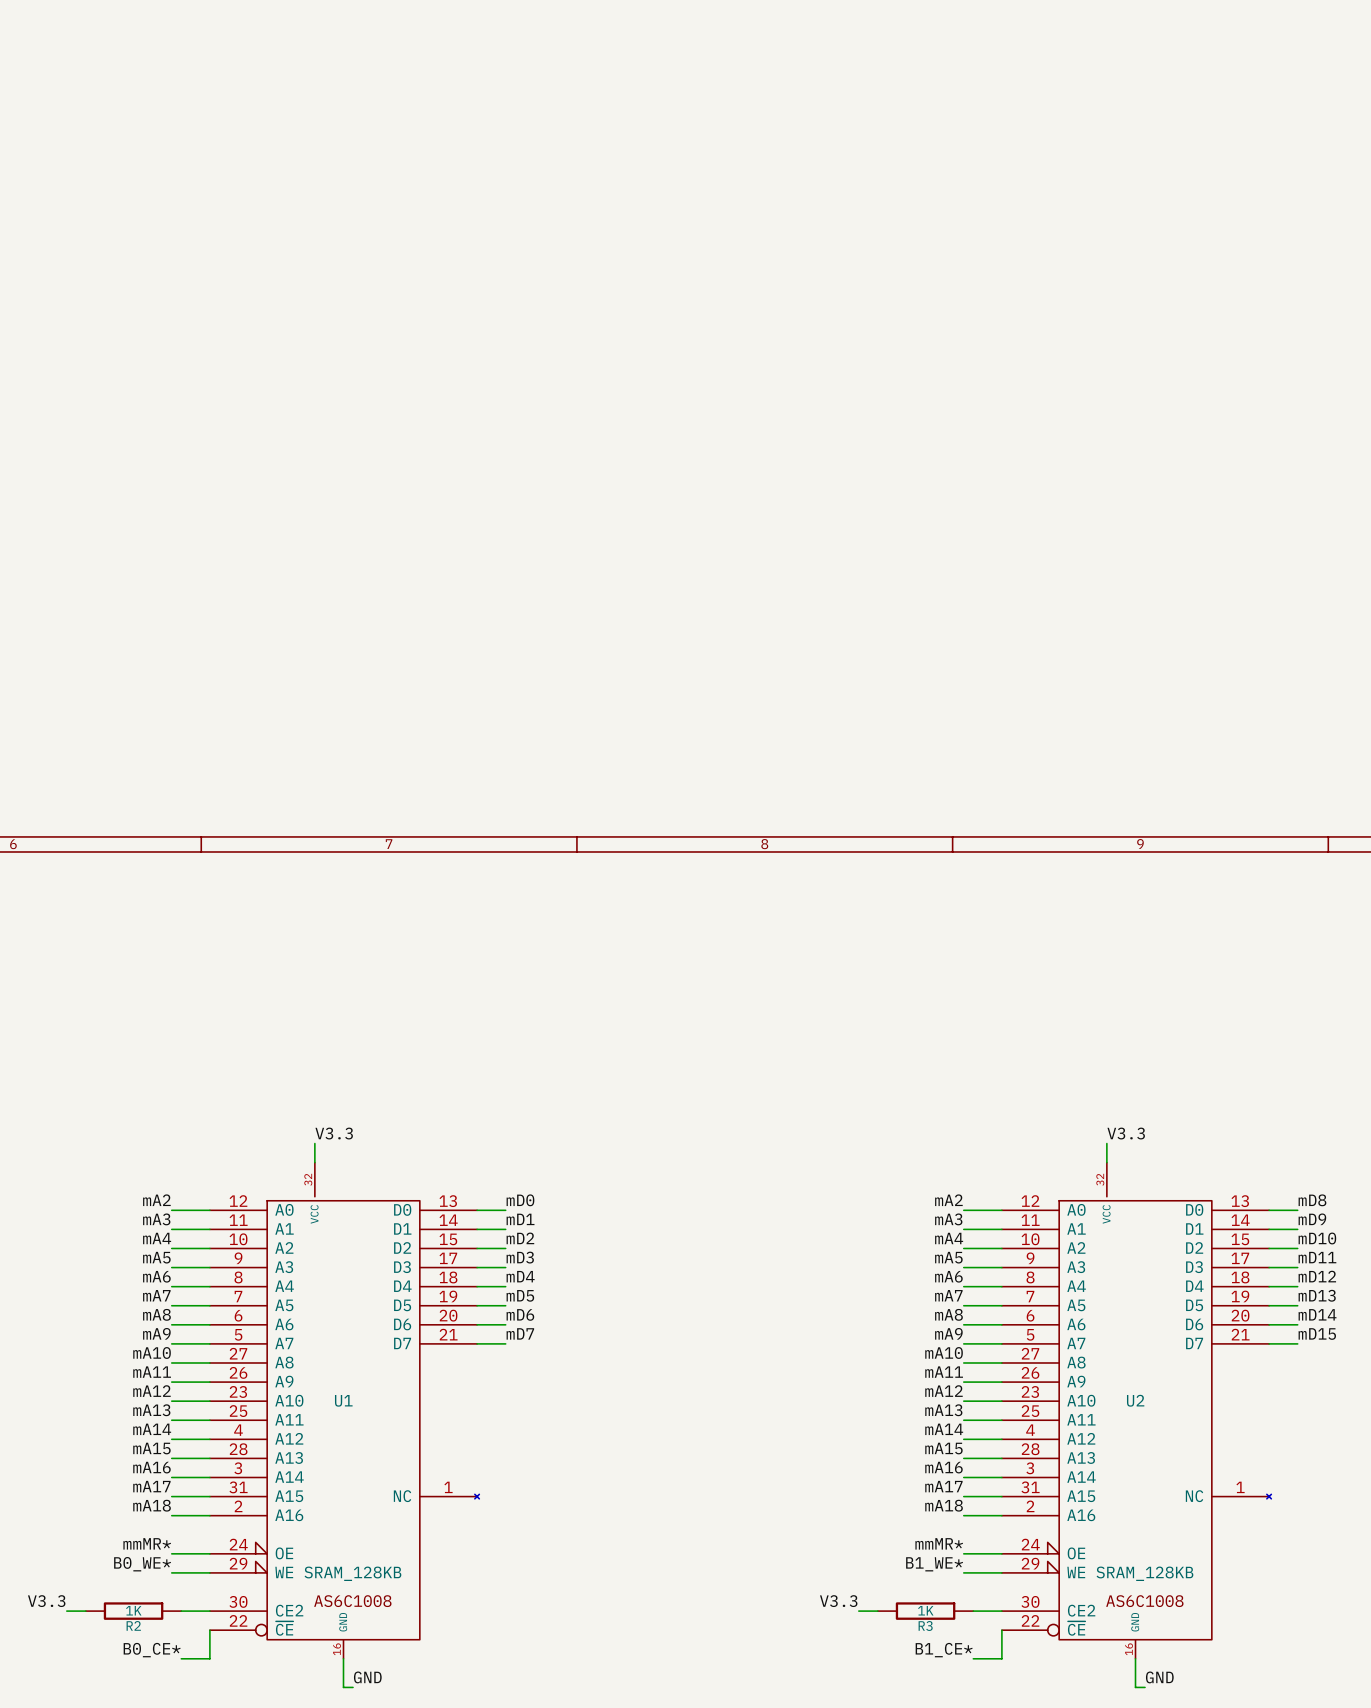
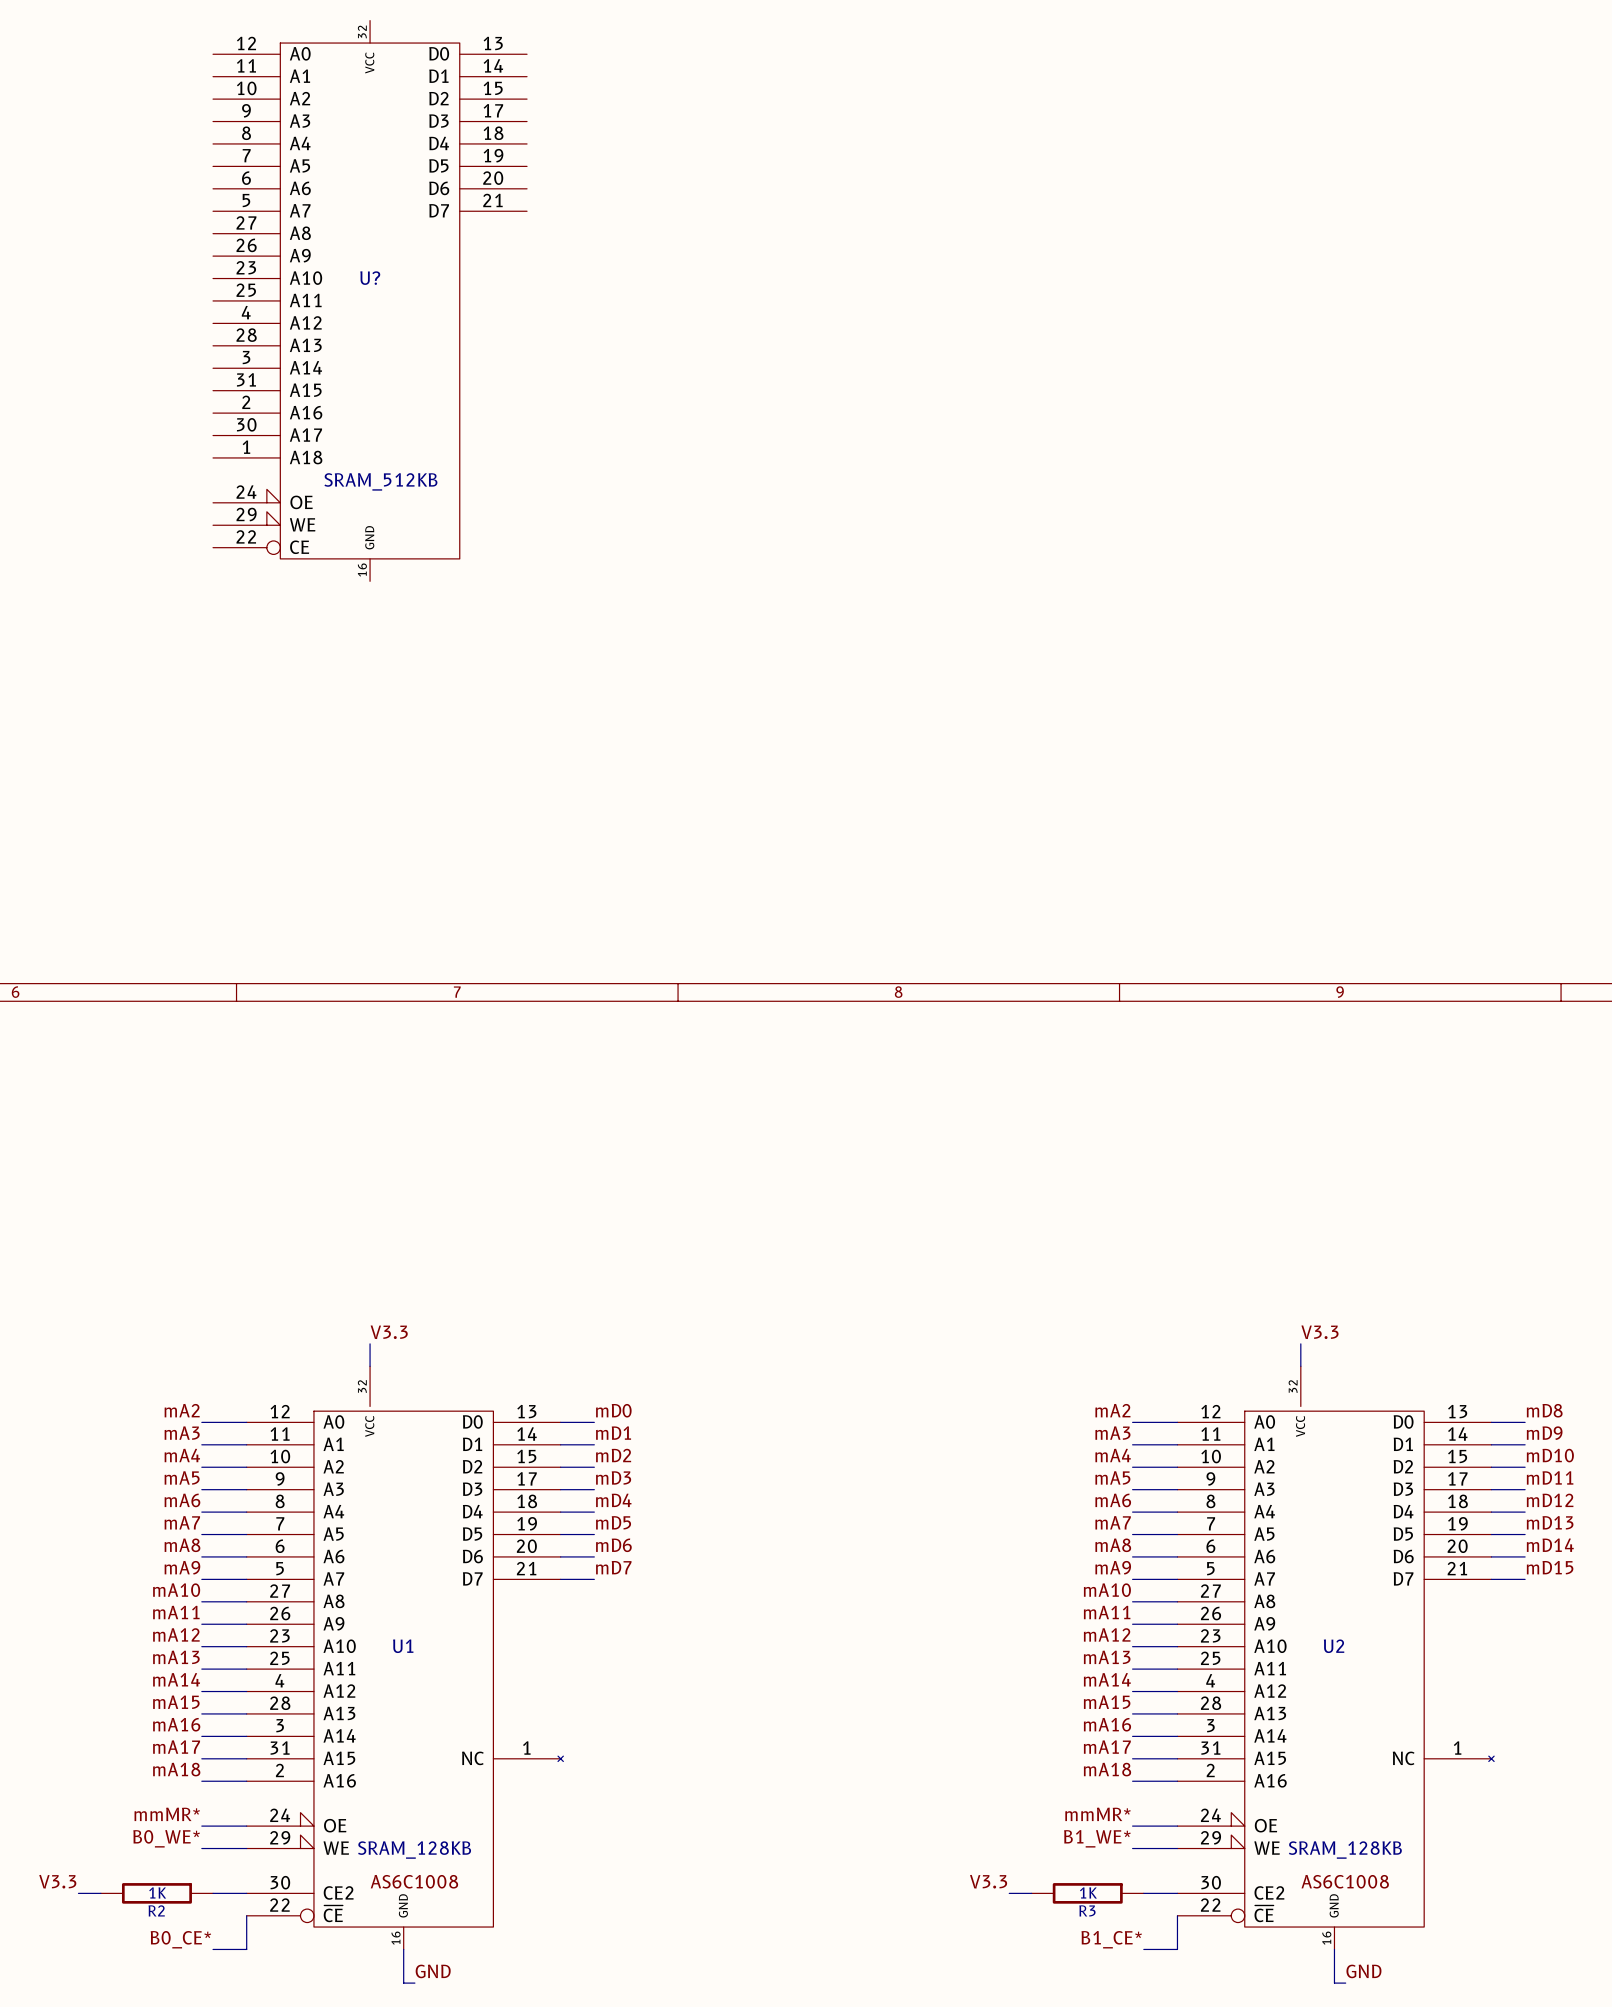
U?: none -> SRAM_512KB (370, 300)

